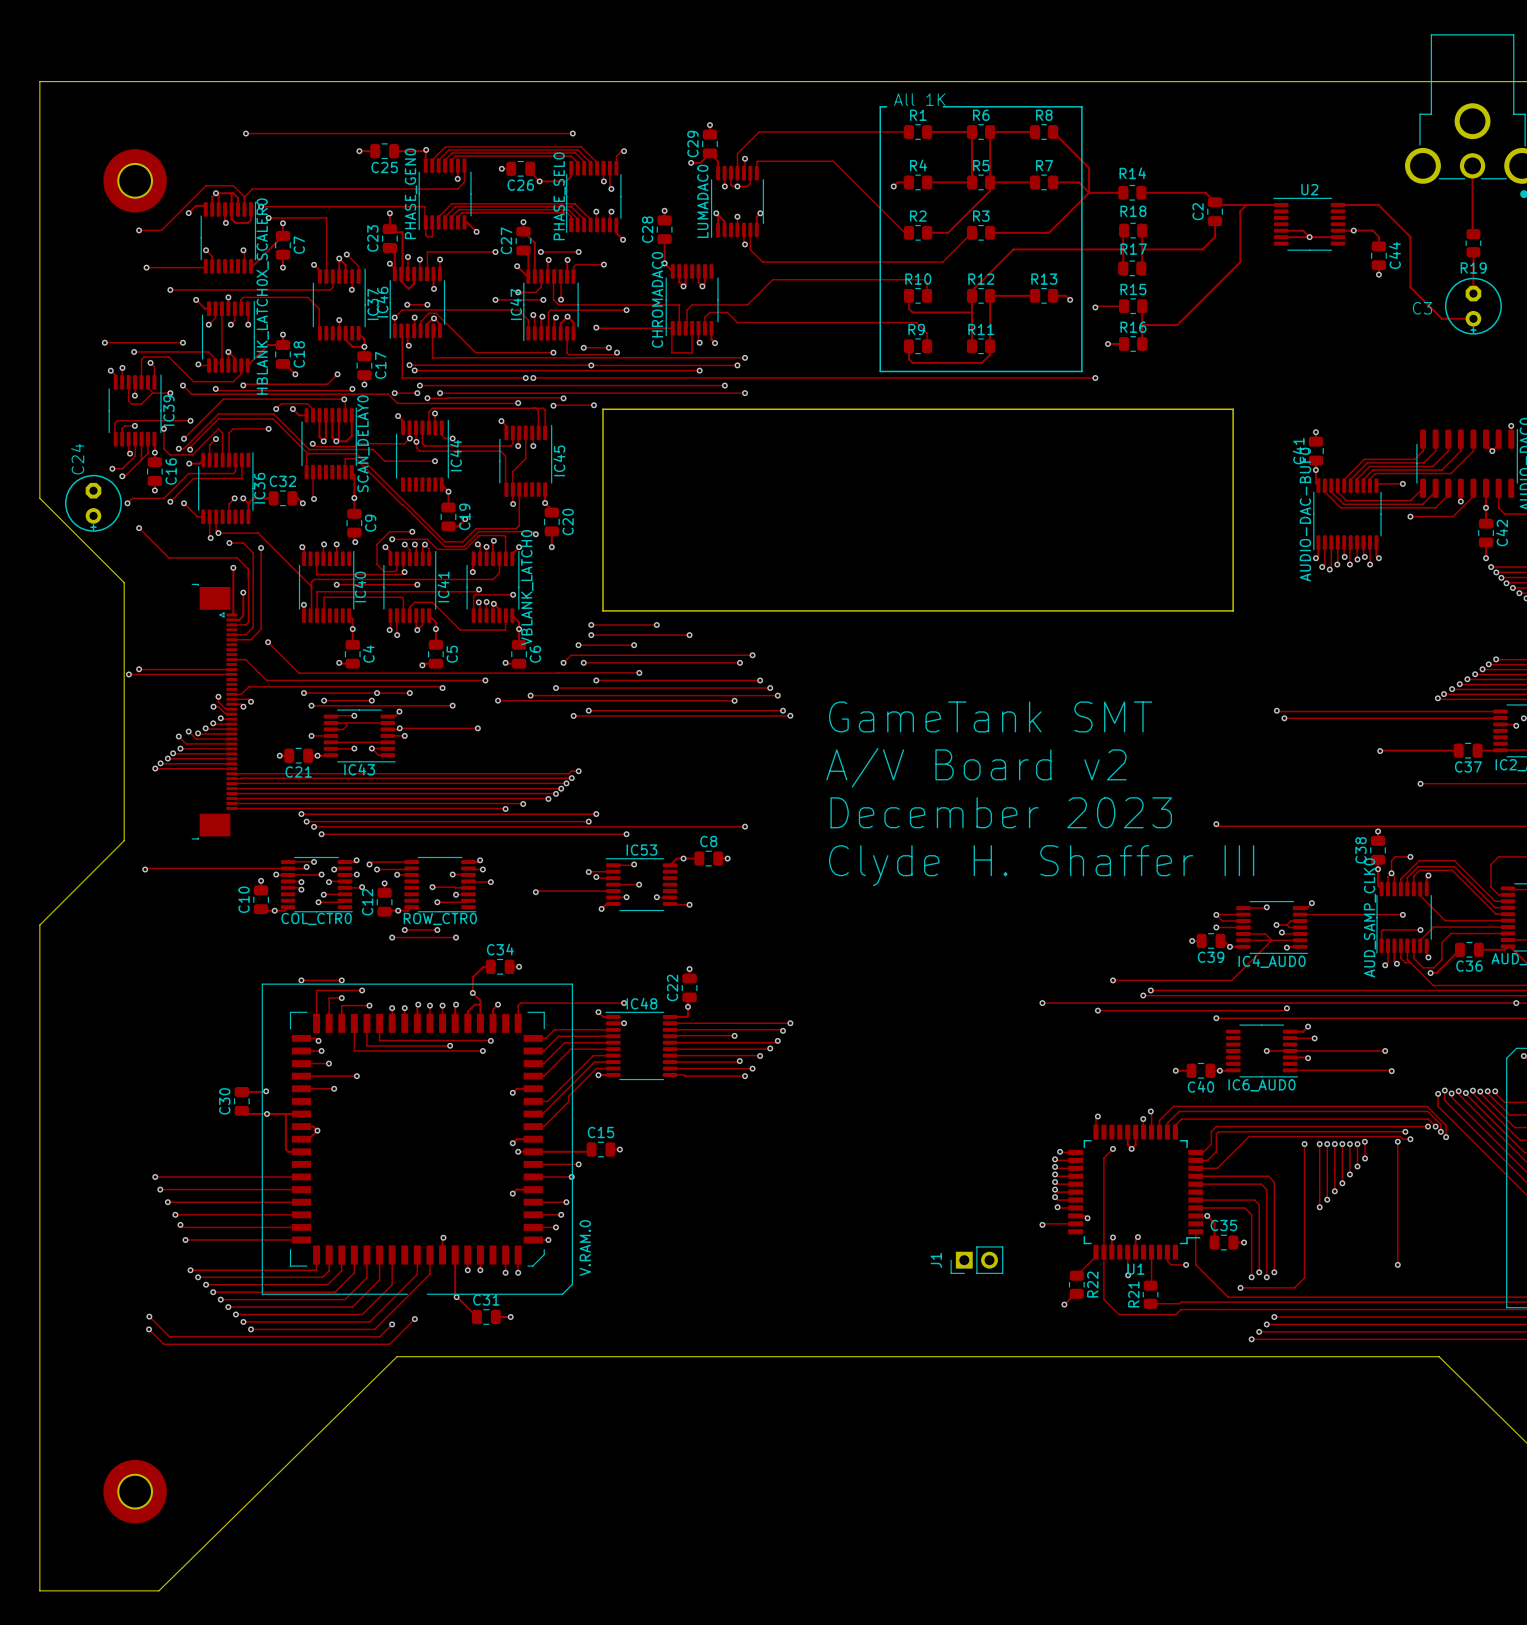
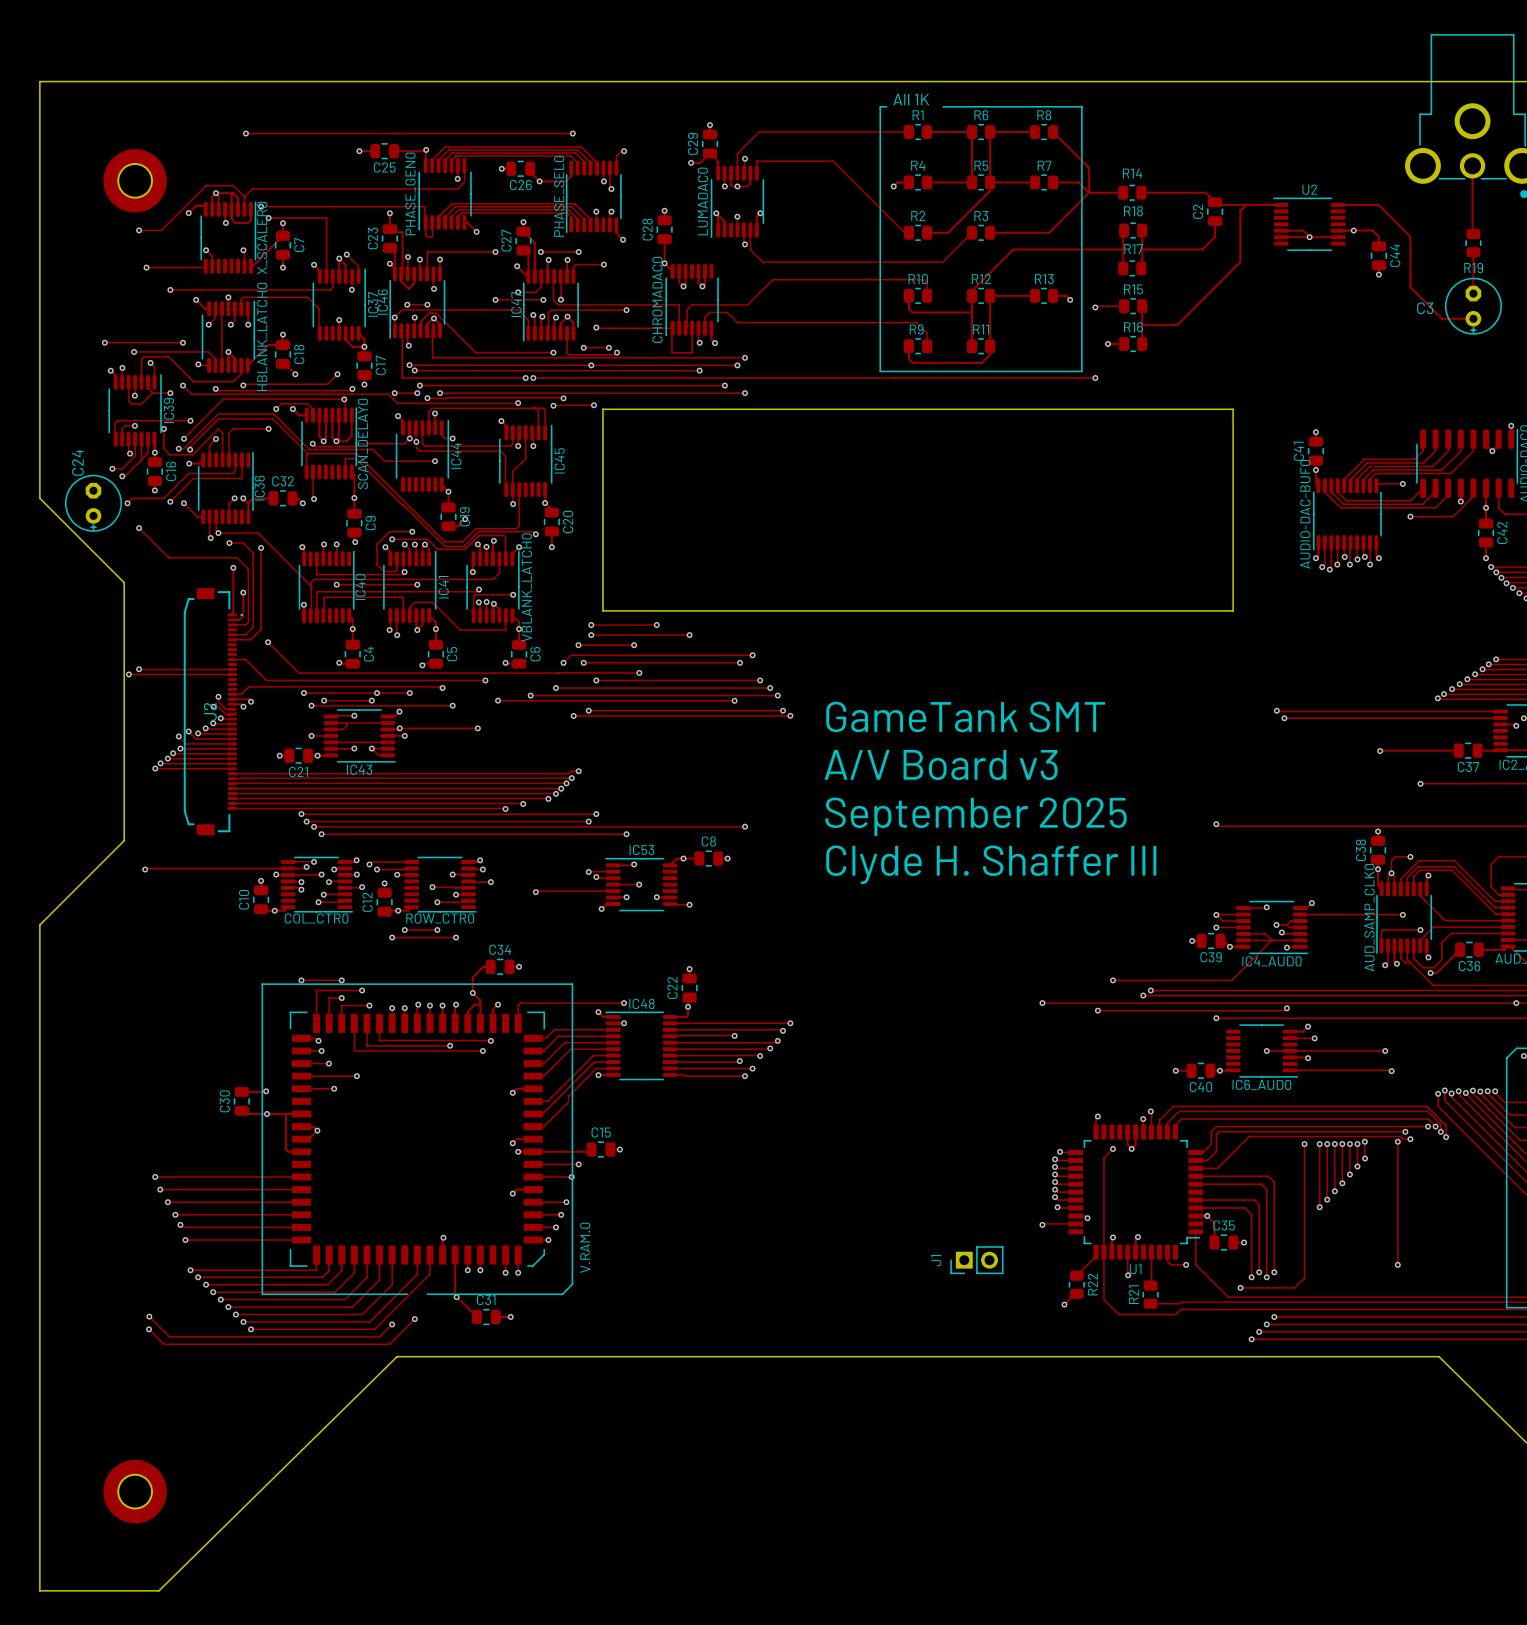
J2: none -> (213, 711)
part: (214, 711) -> none
text: A/V Board v2 (976, 767) -> A/V Board v3 (941, 765)
text: December 2023 (1001, 812) -> September 2025 (976, 816)

